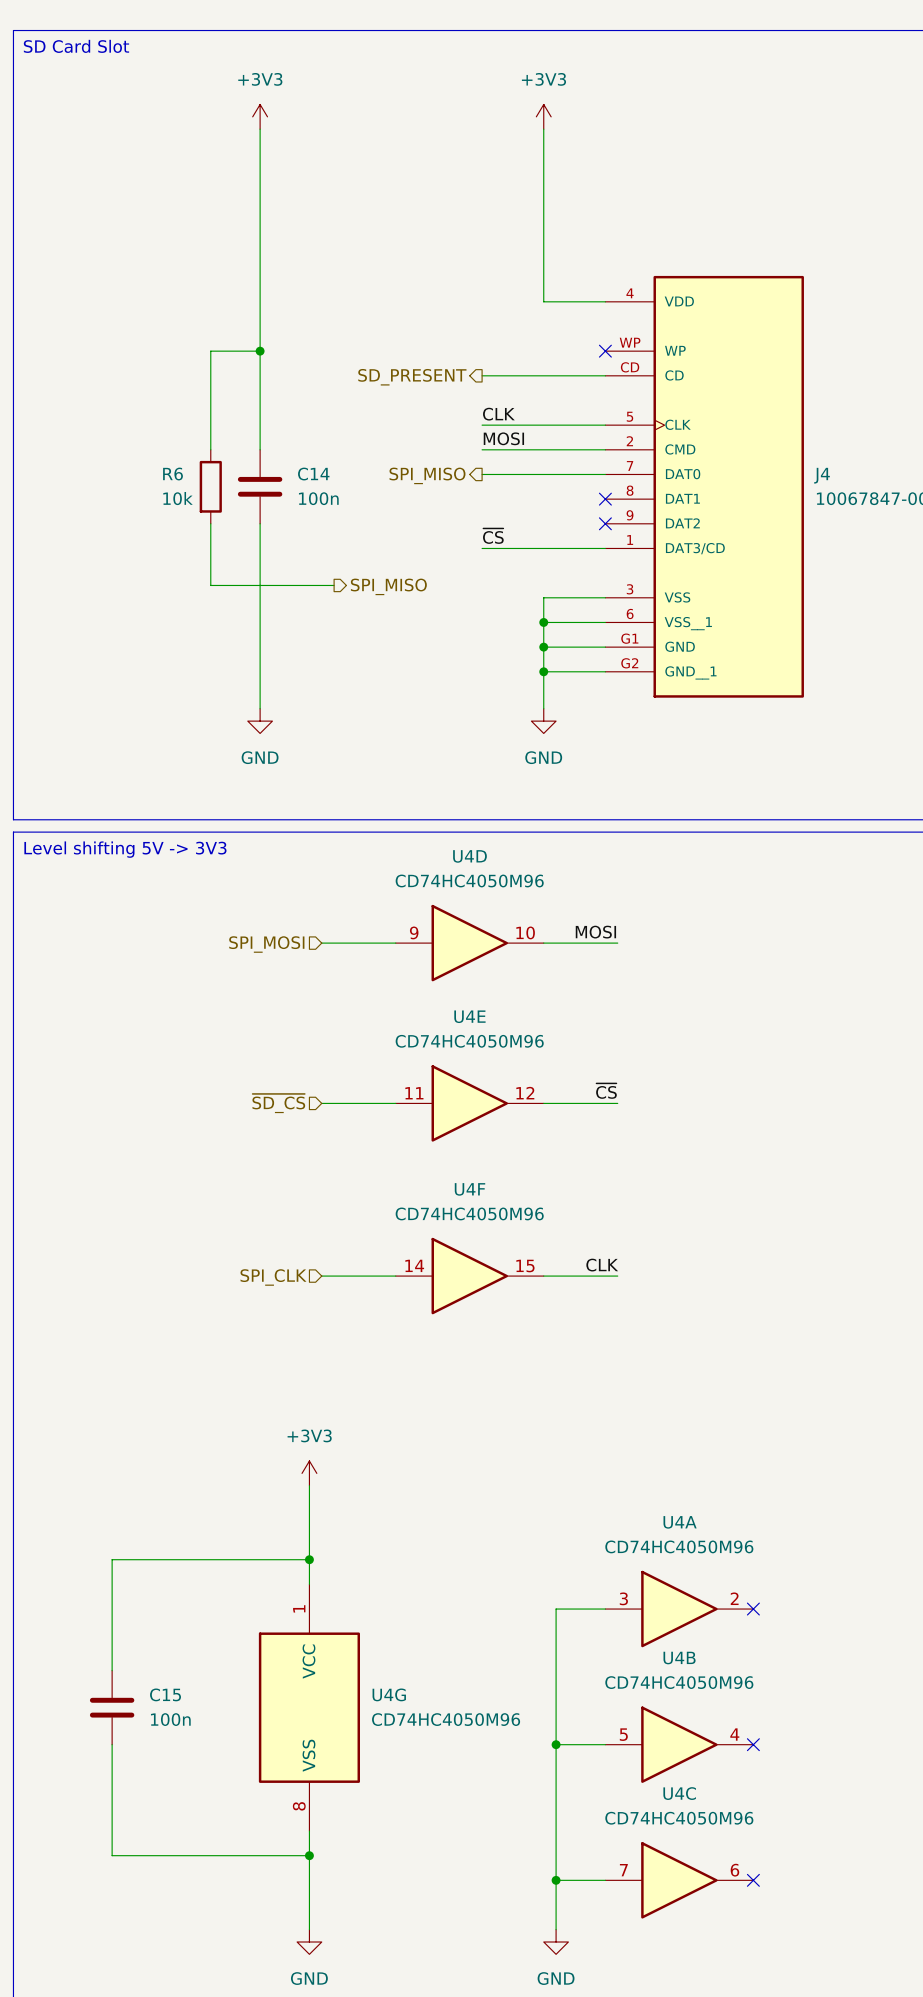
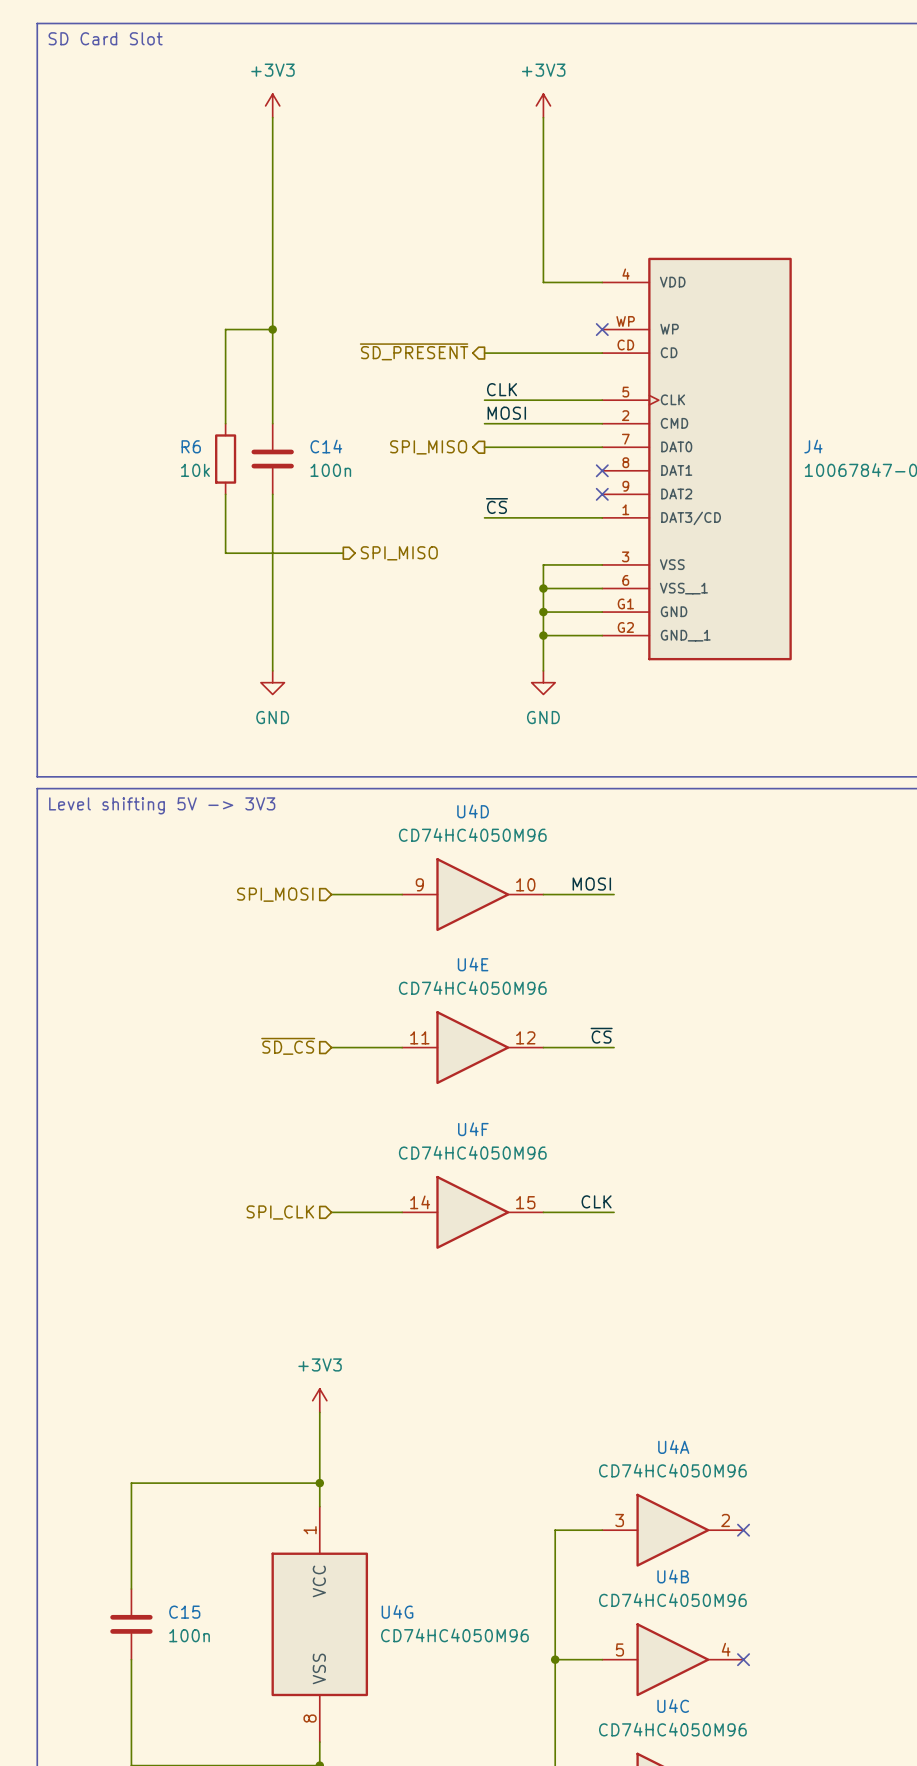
hierarchical label: SD_PRESENT (412, 377) -> ~{SD_PRESENT} (414, 351)

